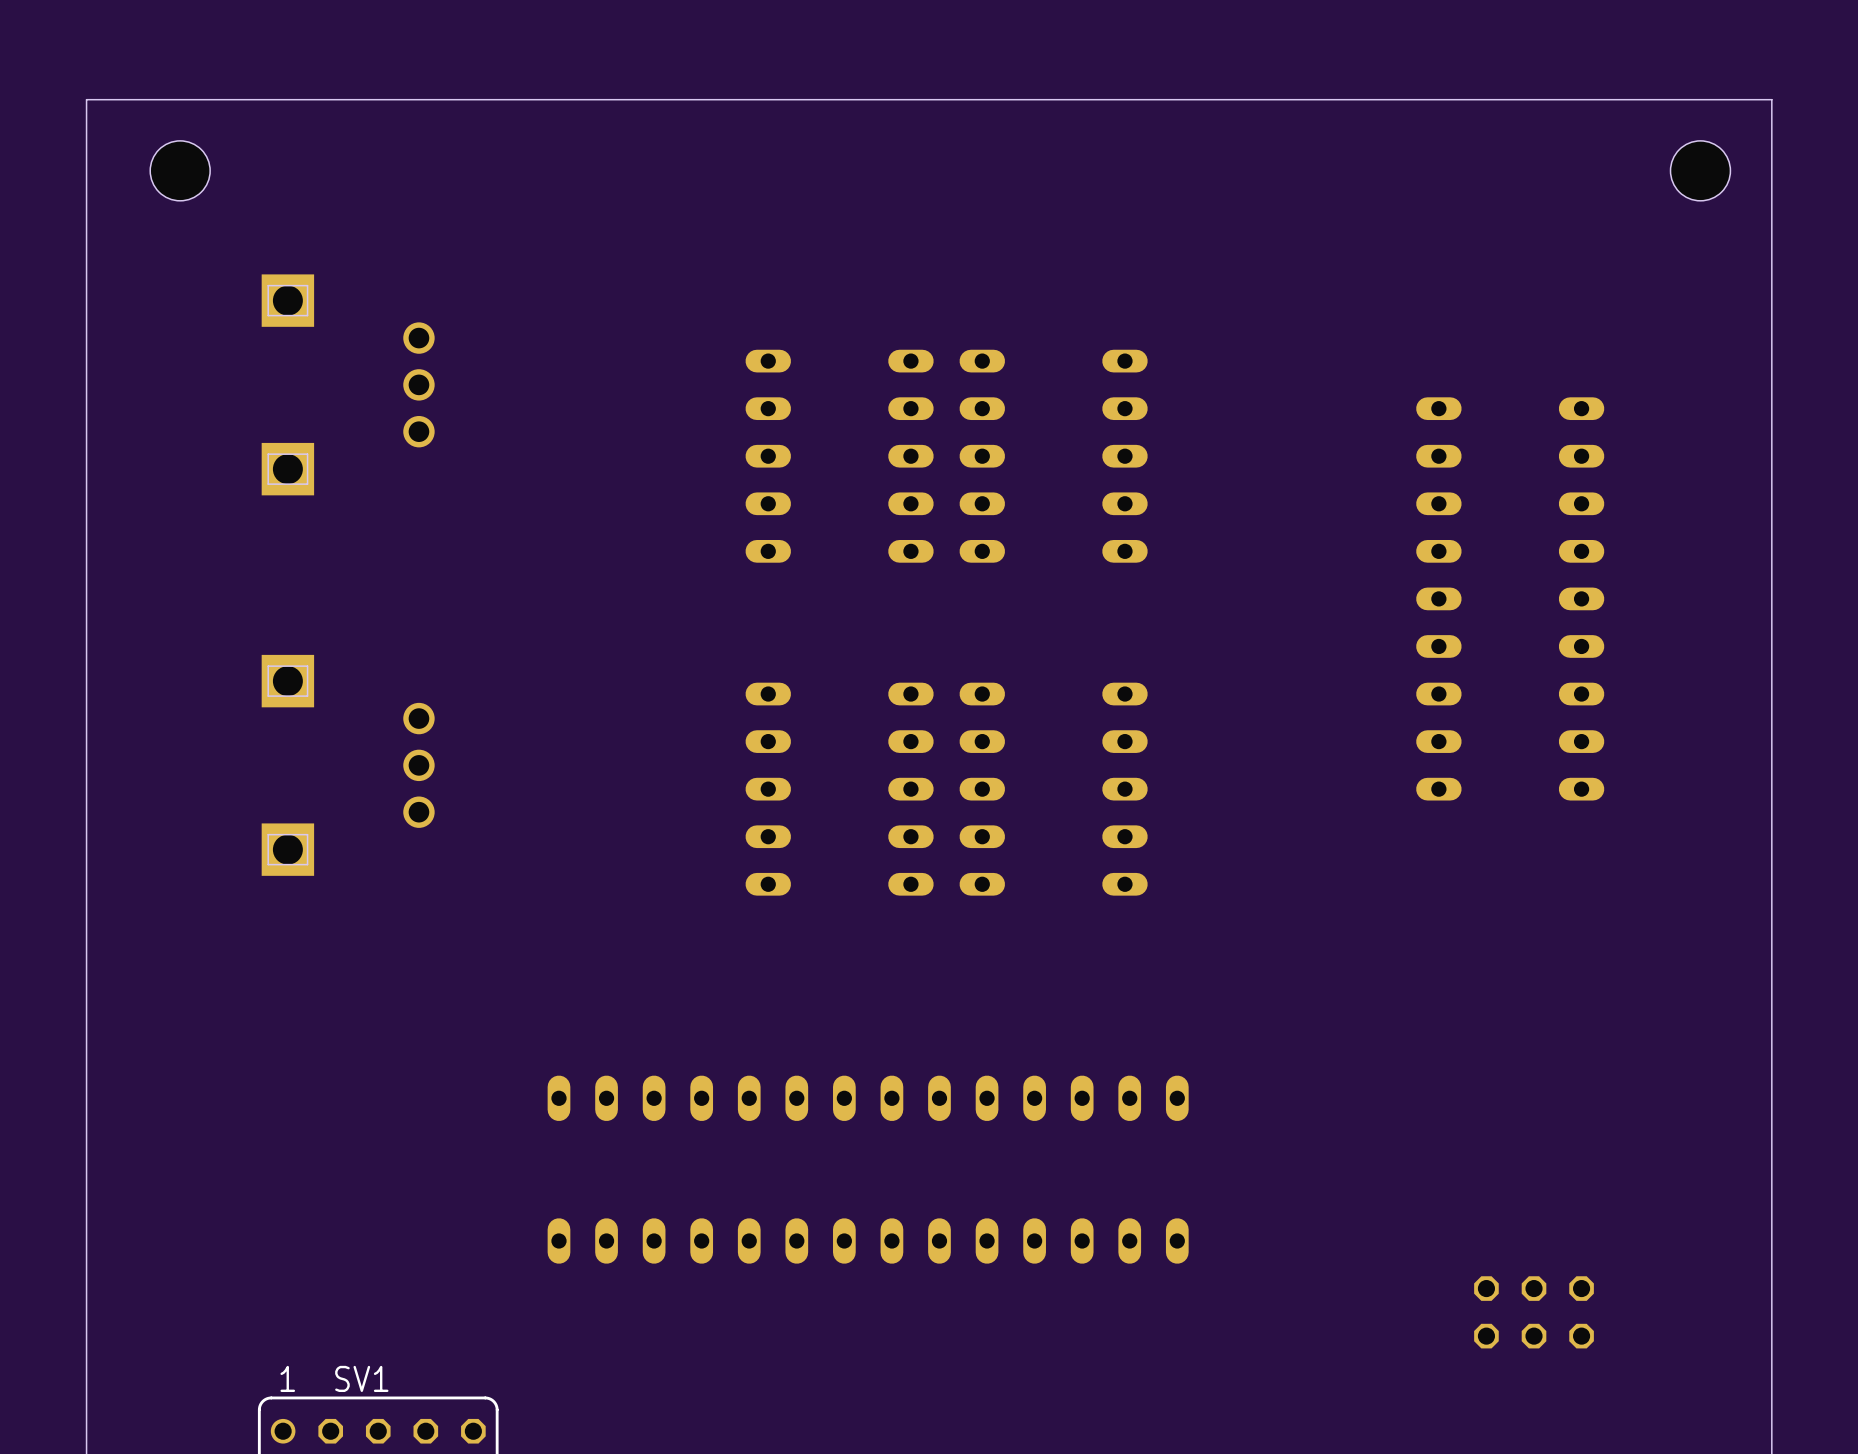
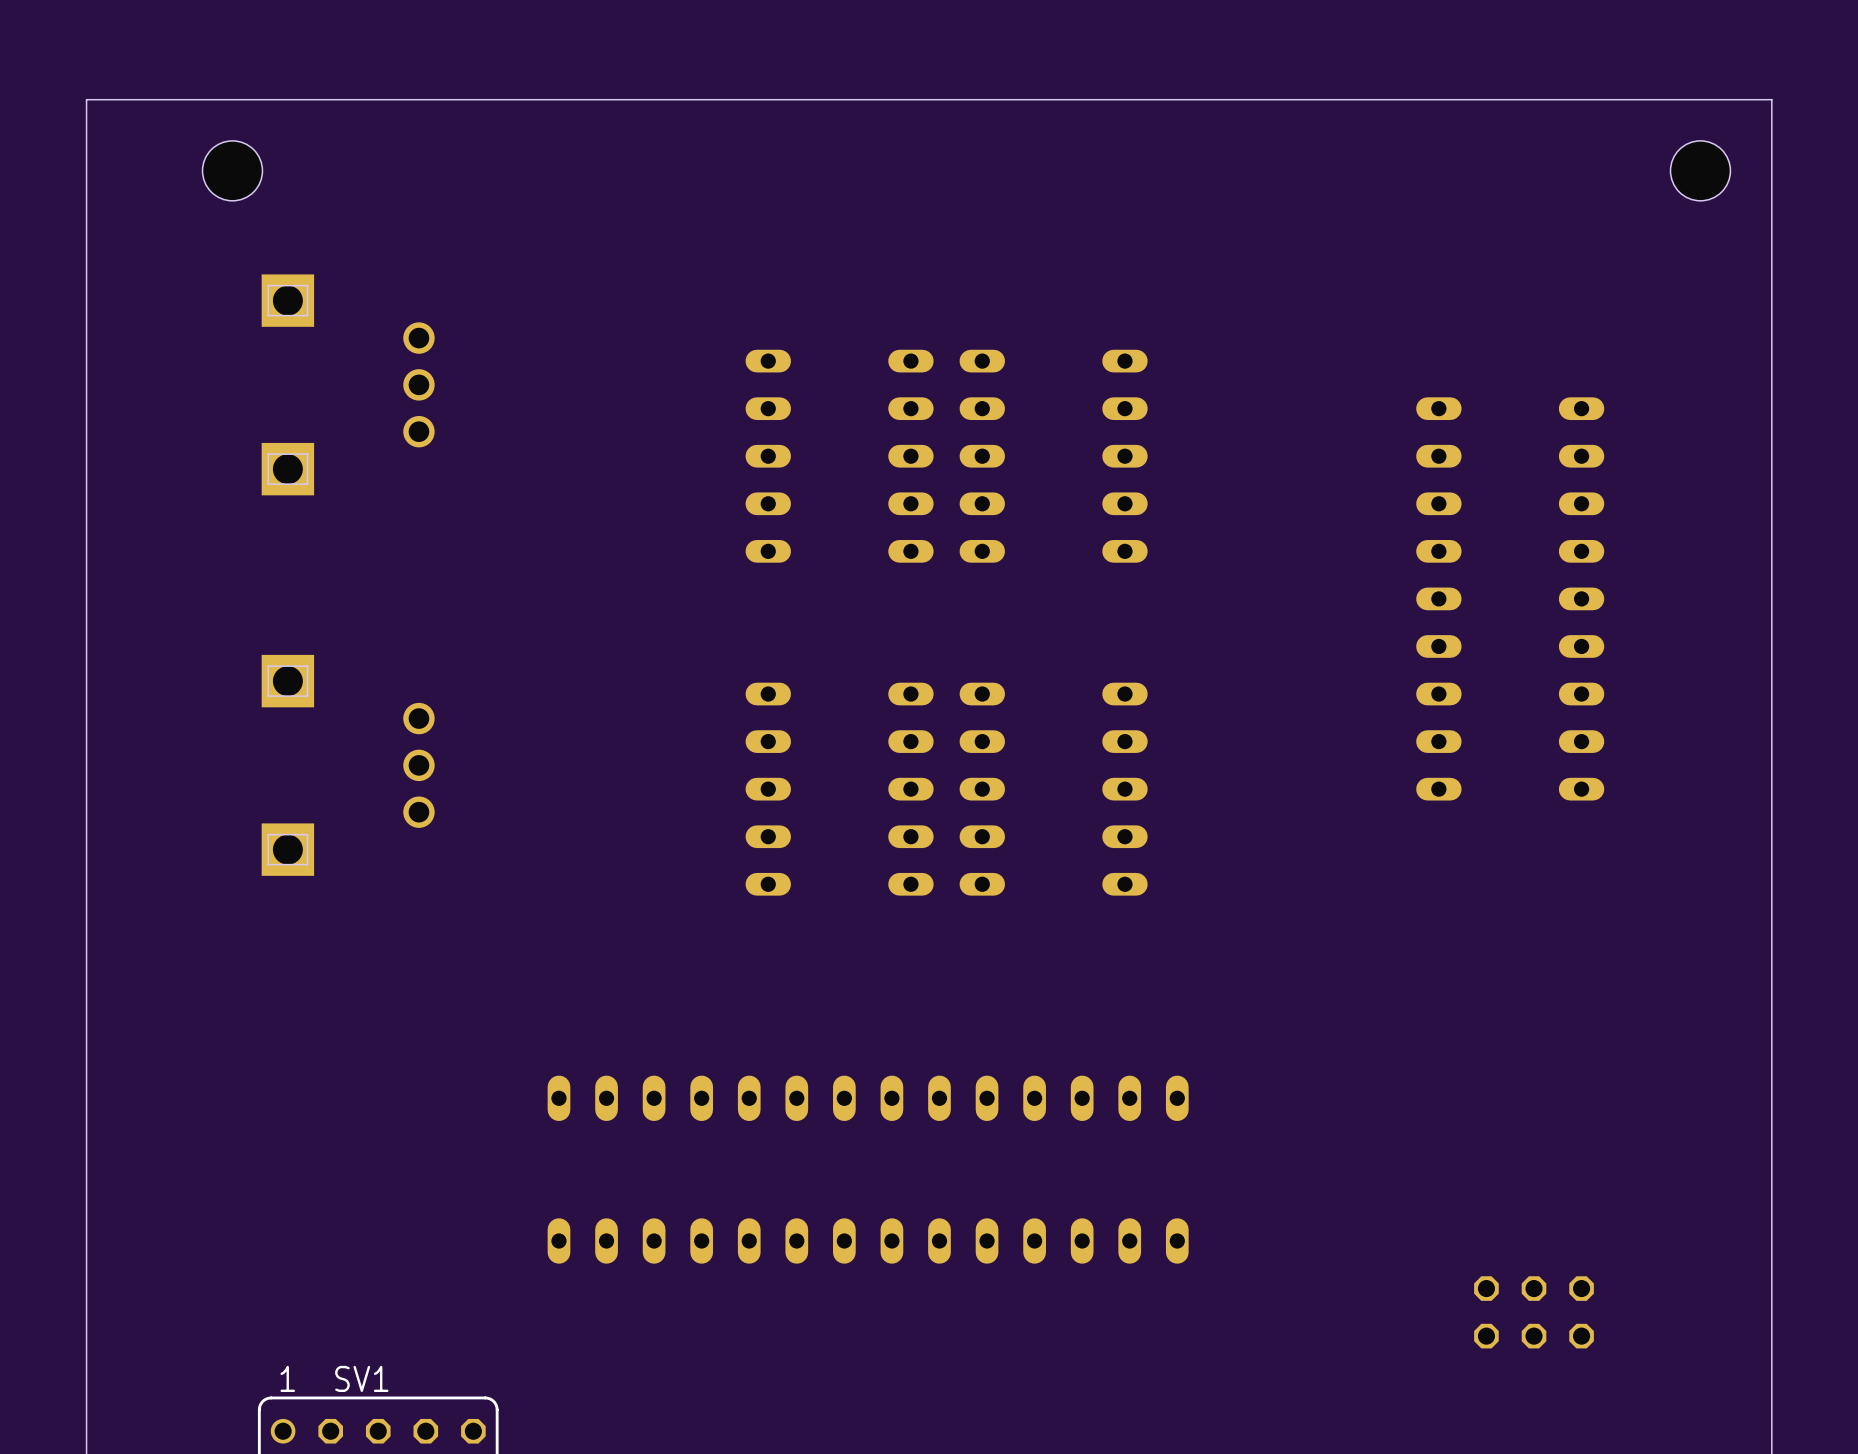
hole position: (180, 170) -> (232, 170)

